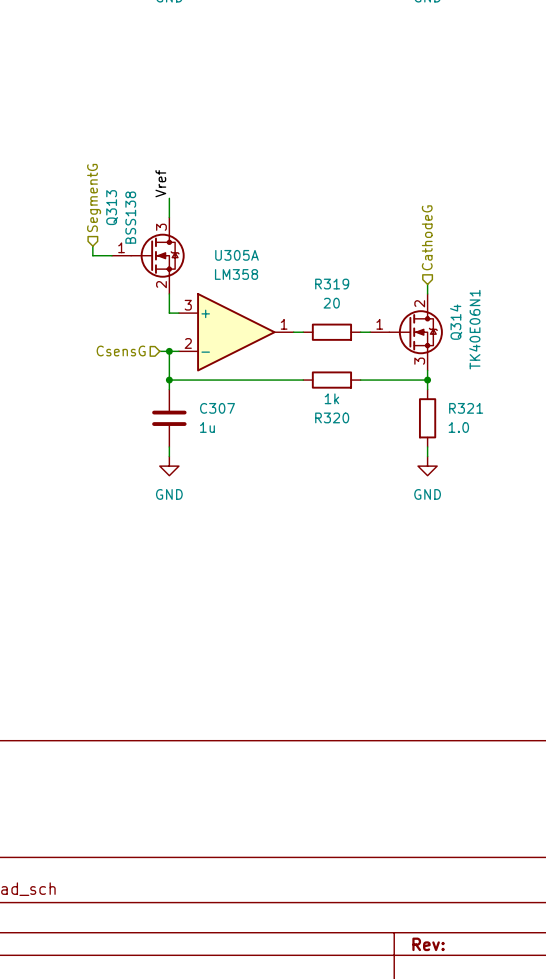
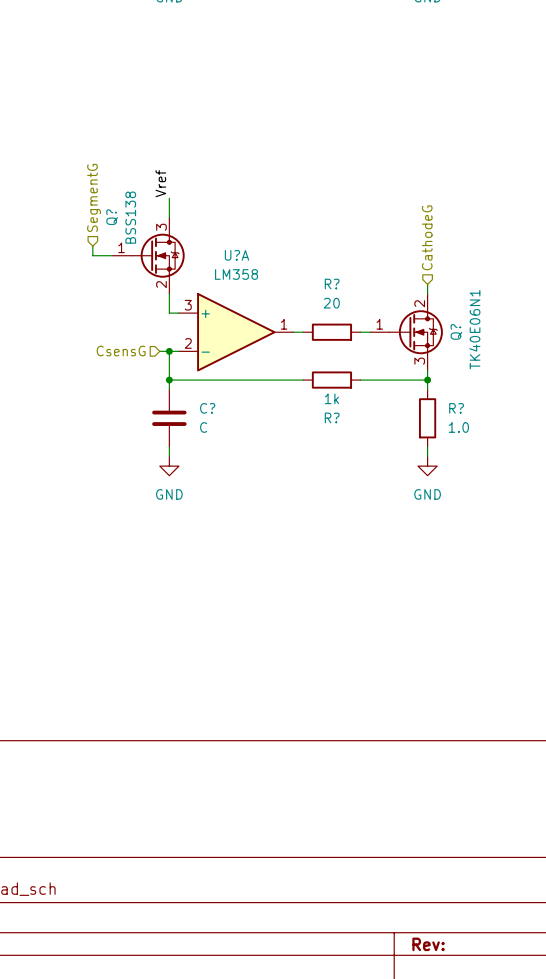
Q313 name: Q313 (112, 207) -> Q? (112, 217)
U305A name: U305A (236, 255) -> U?A (236, 255)
R319 name: R319 (332, 284) -> R? (332, 284)
Q314 name: Q314 (456, 322) -> Q? (456, 331)
C307 name: C307 (217, 408) -> C? (207, 408)
R321 name: R321 (466, 408) -> R? (456, 408)
R320 name: R320 (332, 417) -> R? (332, 417)
C307 value: 1u (207, 427) -> C (203, 427)

